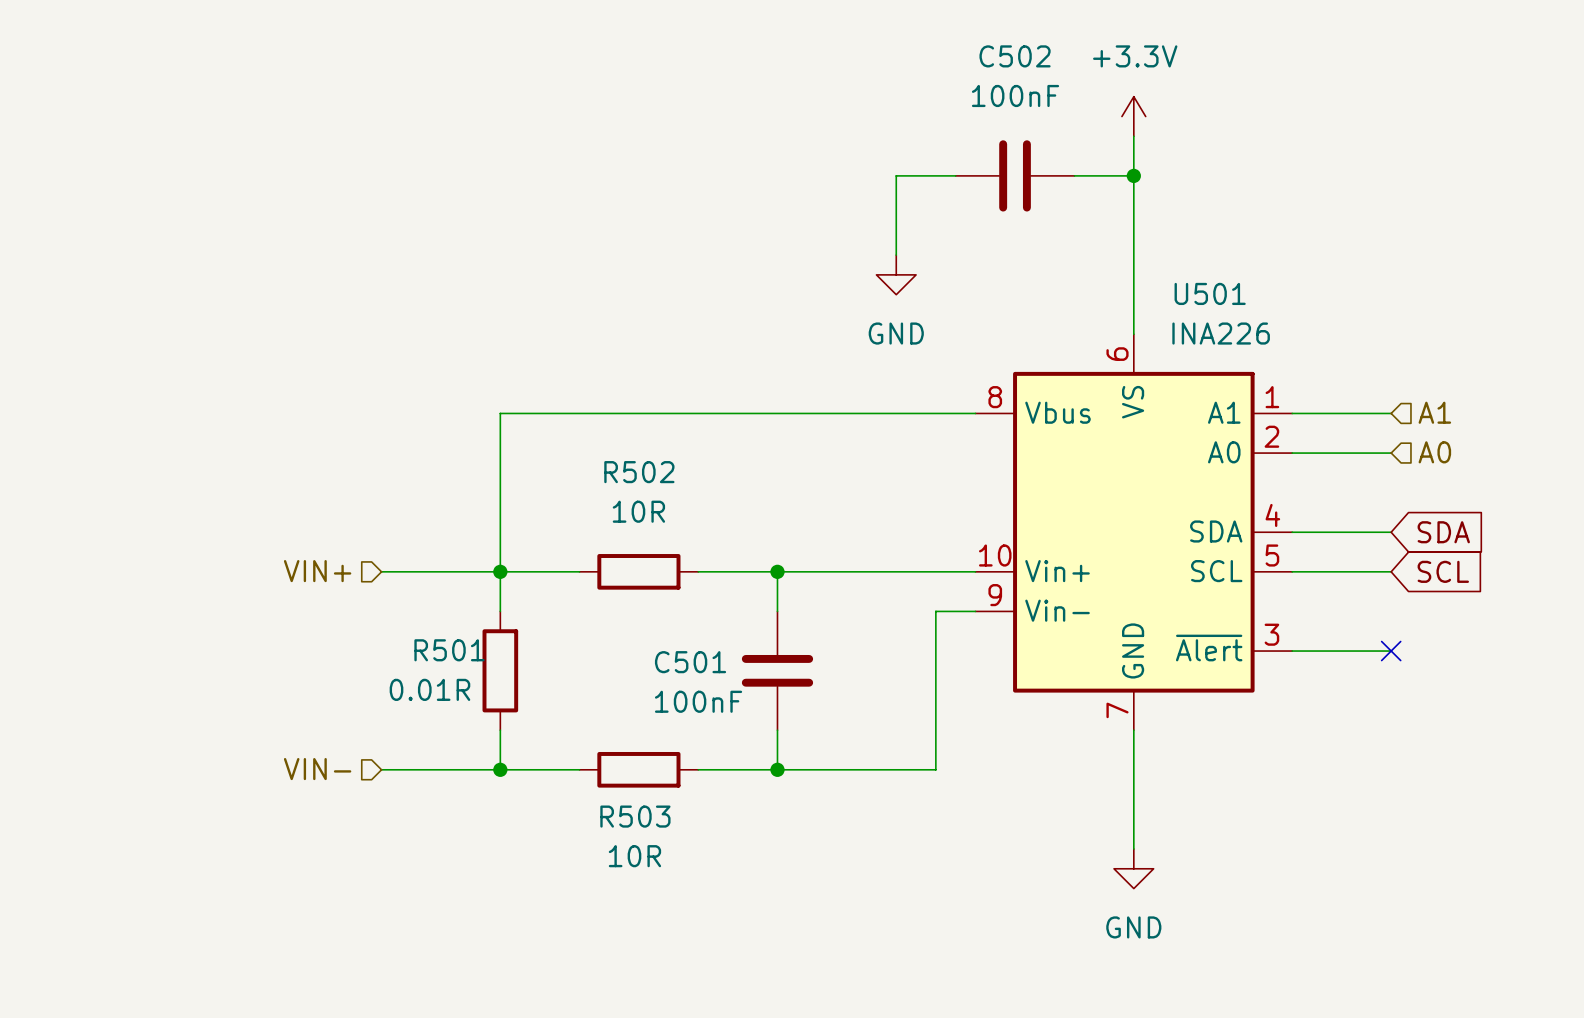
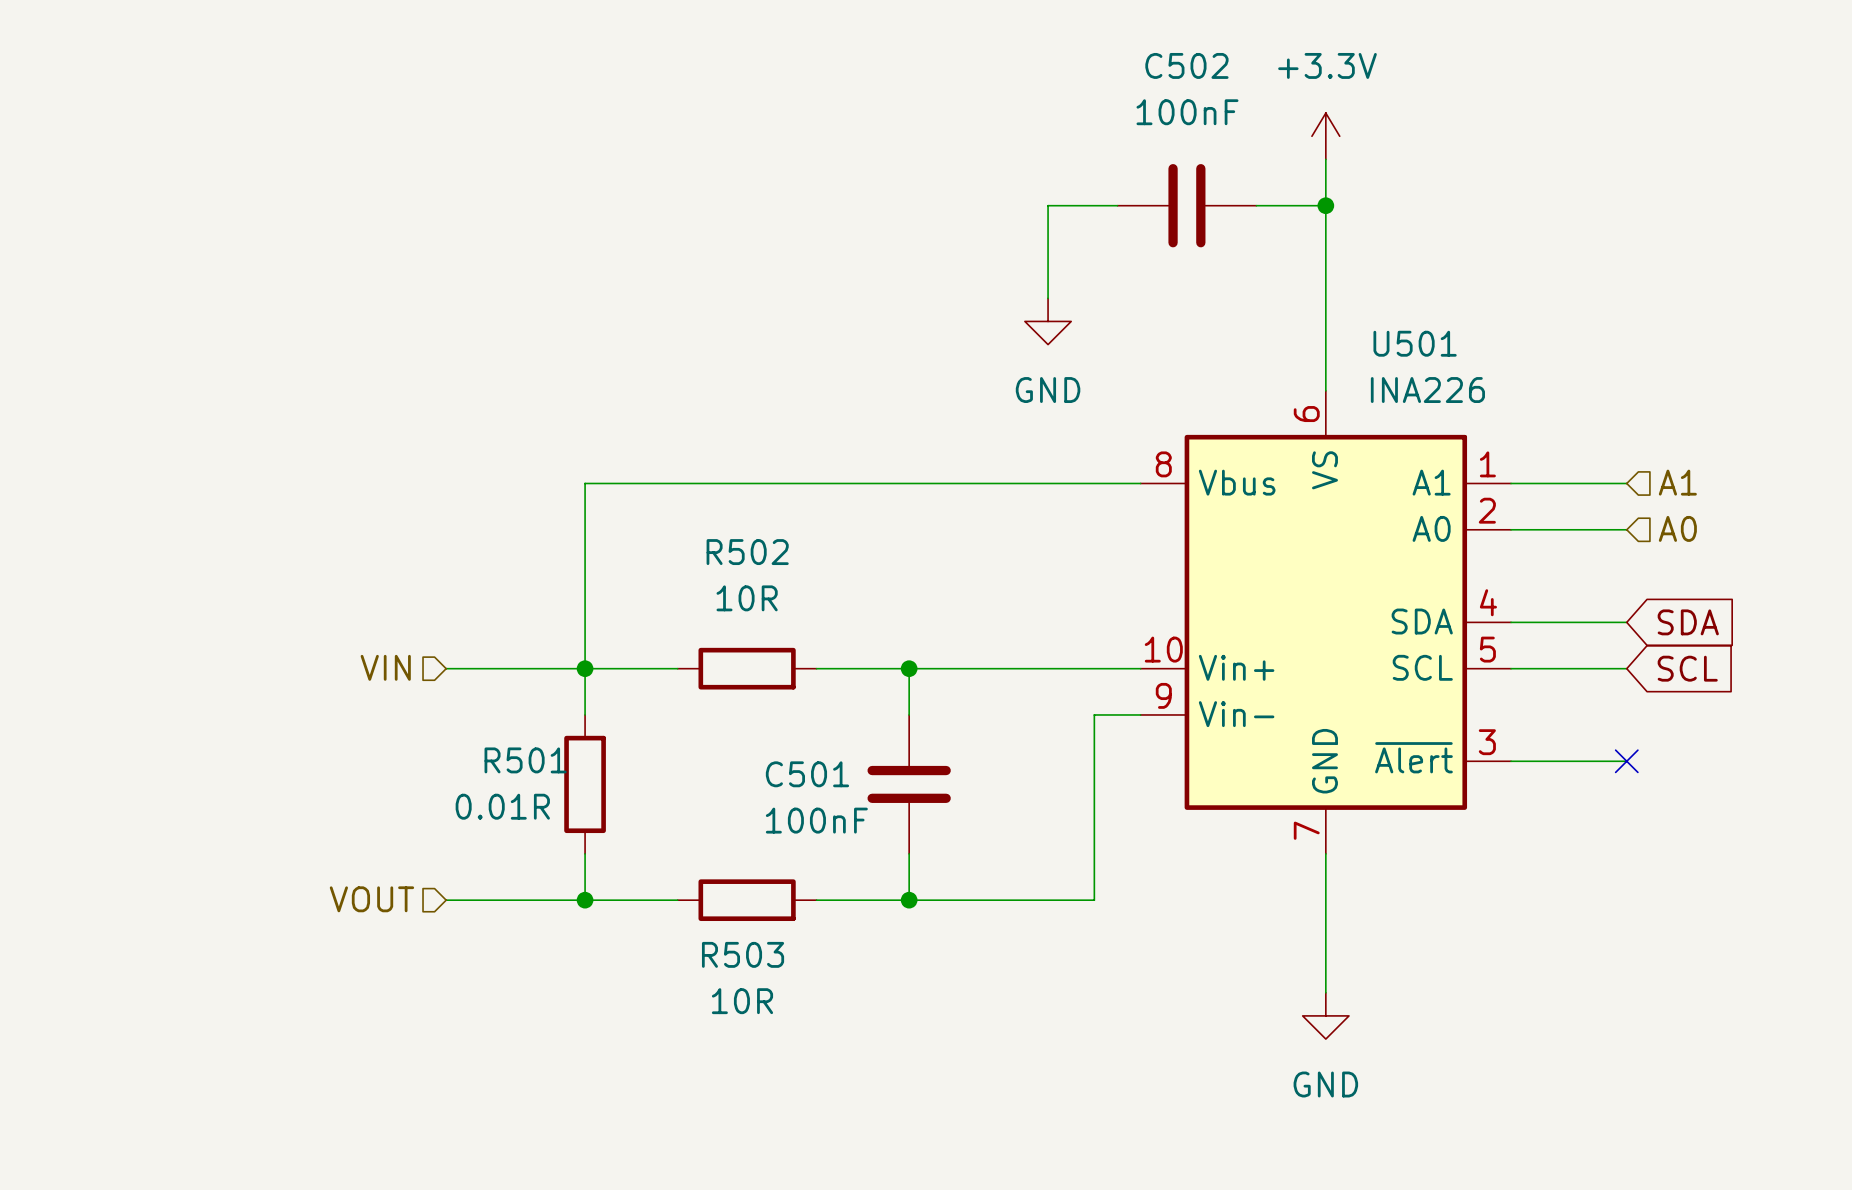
hierarchical label: VIN+ (317, 571) -> VIN (385, 667)
hierarchical label: VIN- (317, 769) -> VOUT (371, 899)

